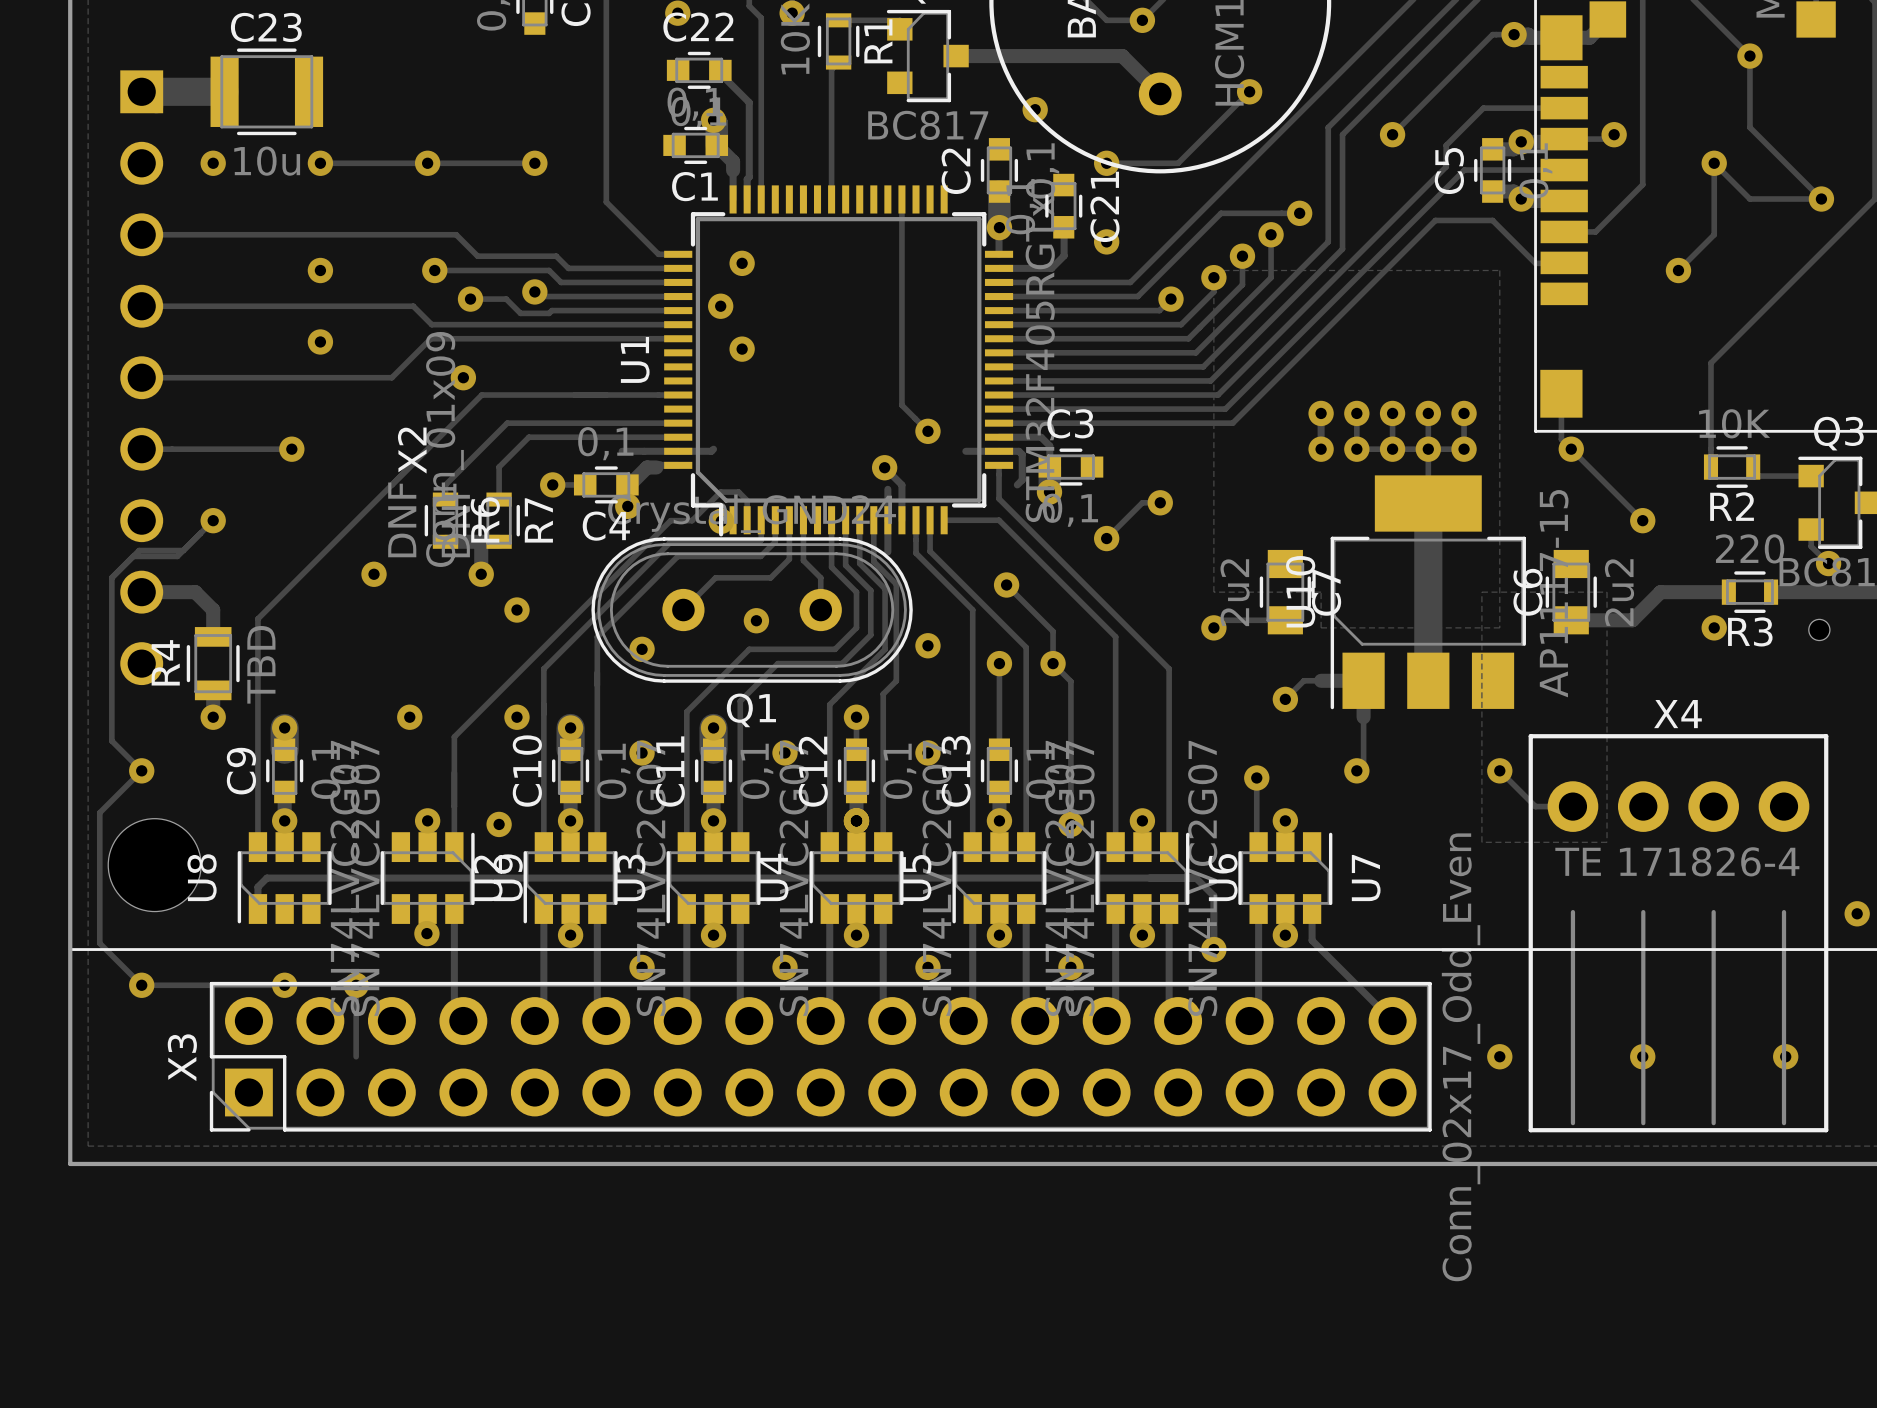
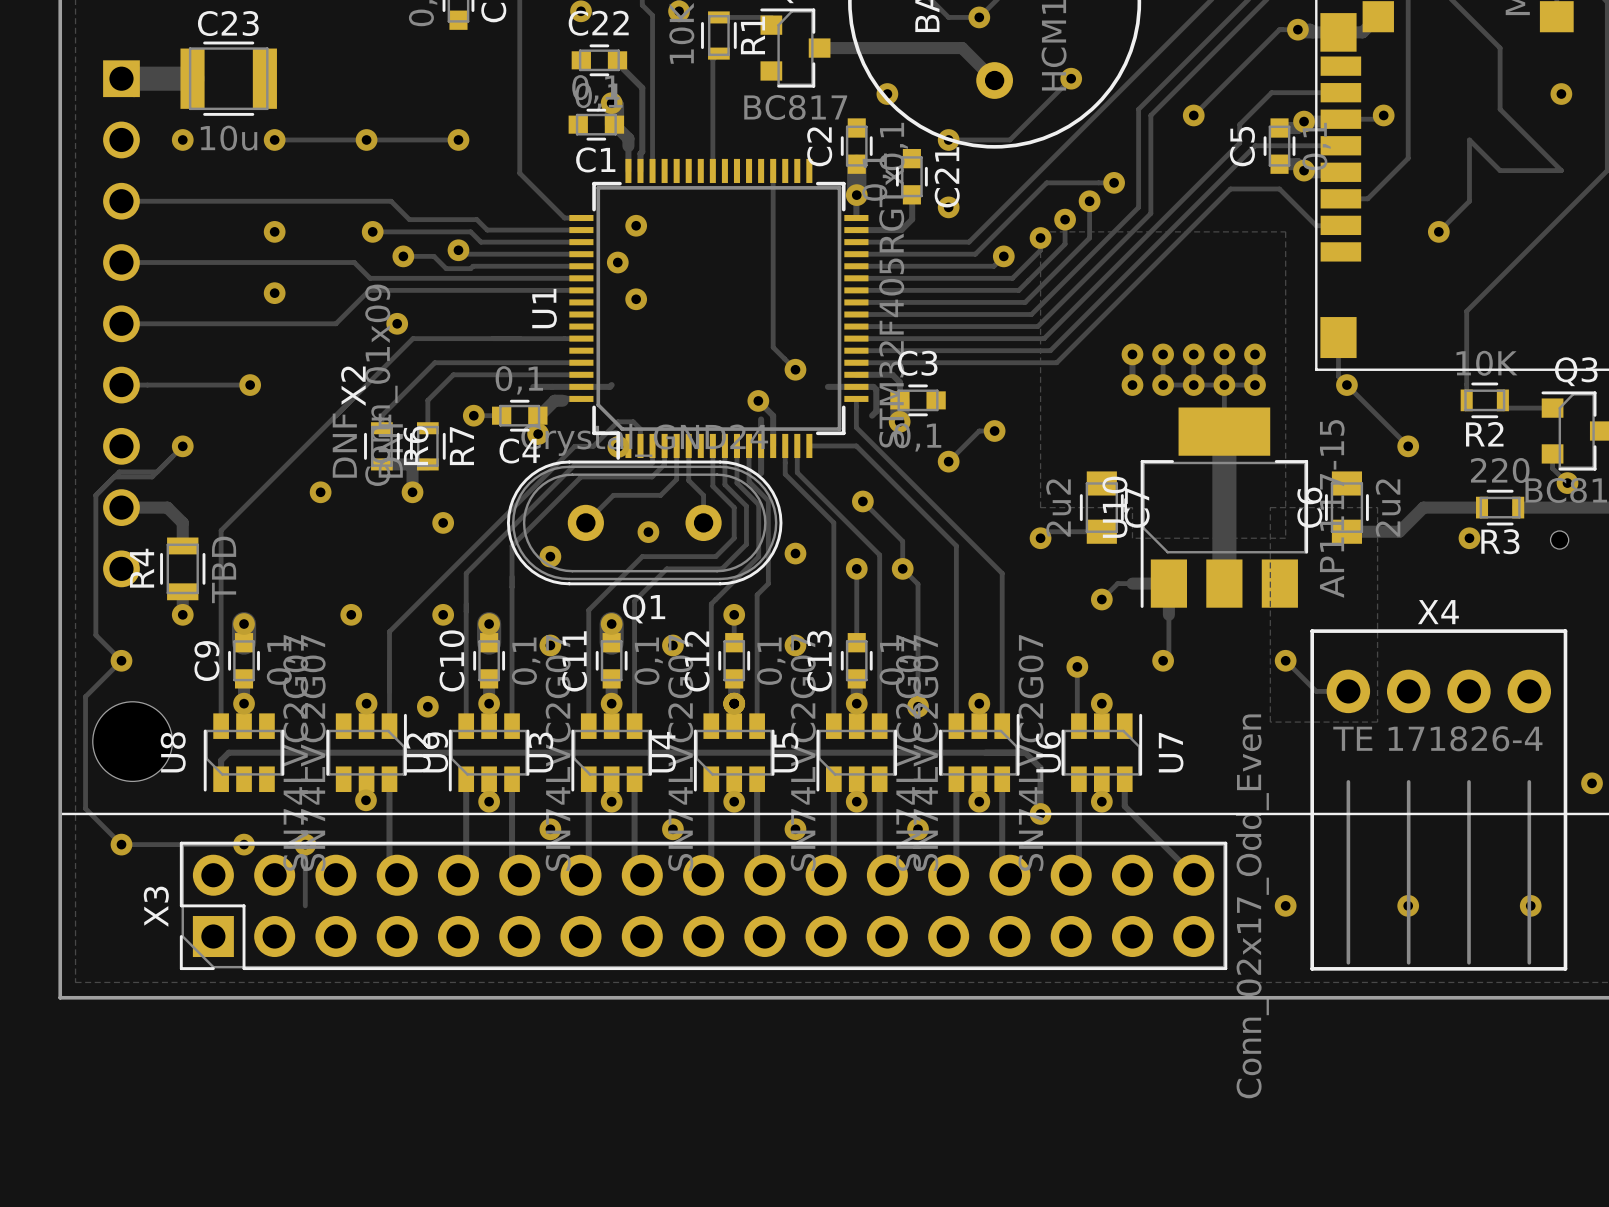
via: (1749, 56) -> none
via: none -> (1561, 94)
via: (1714, 163) -> none
via: (1821, 199) -> none

